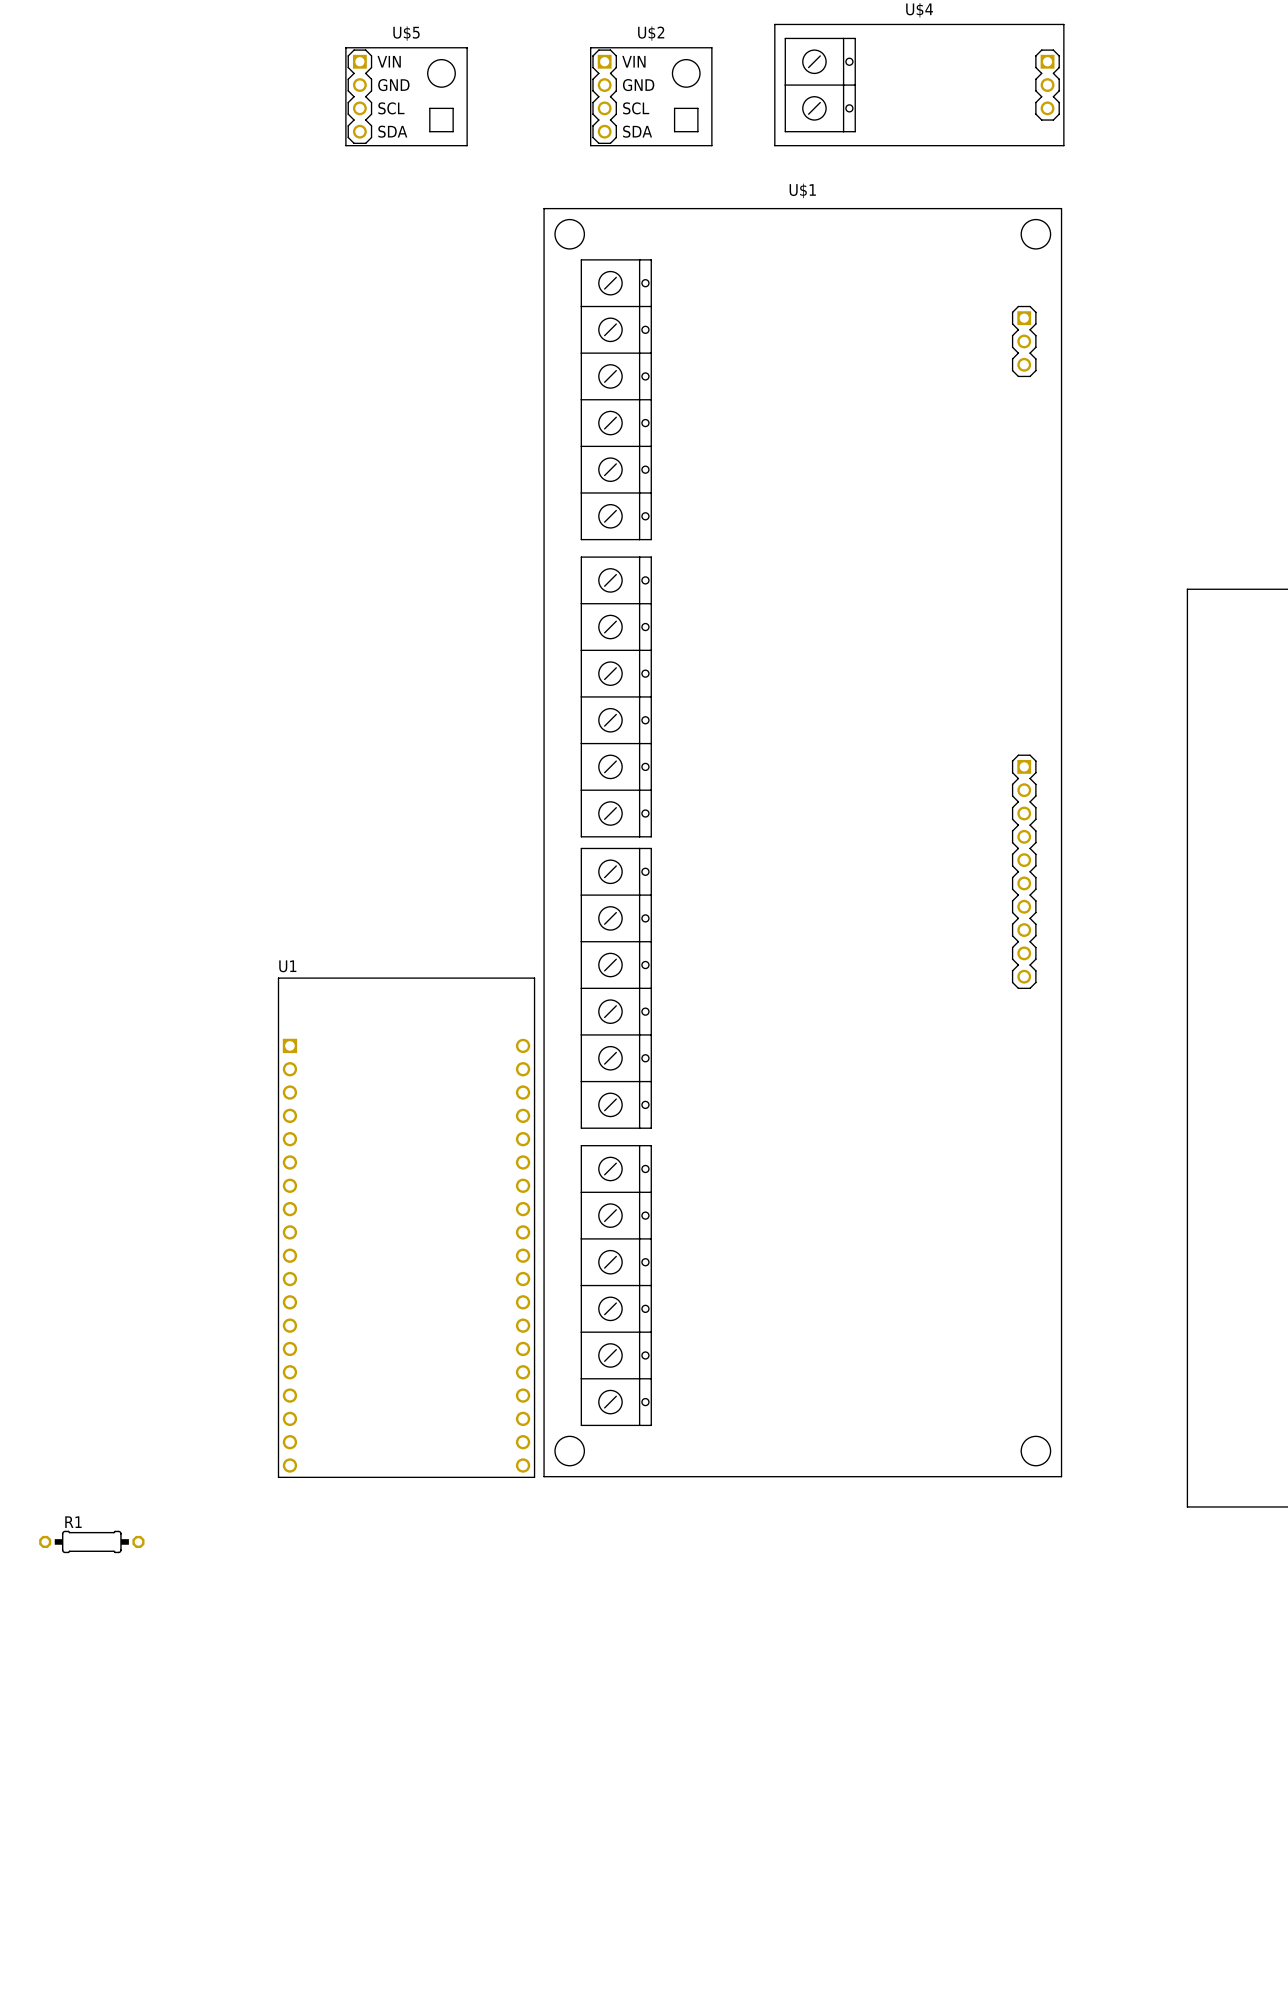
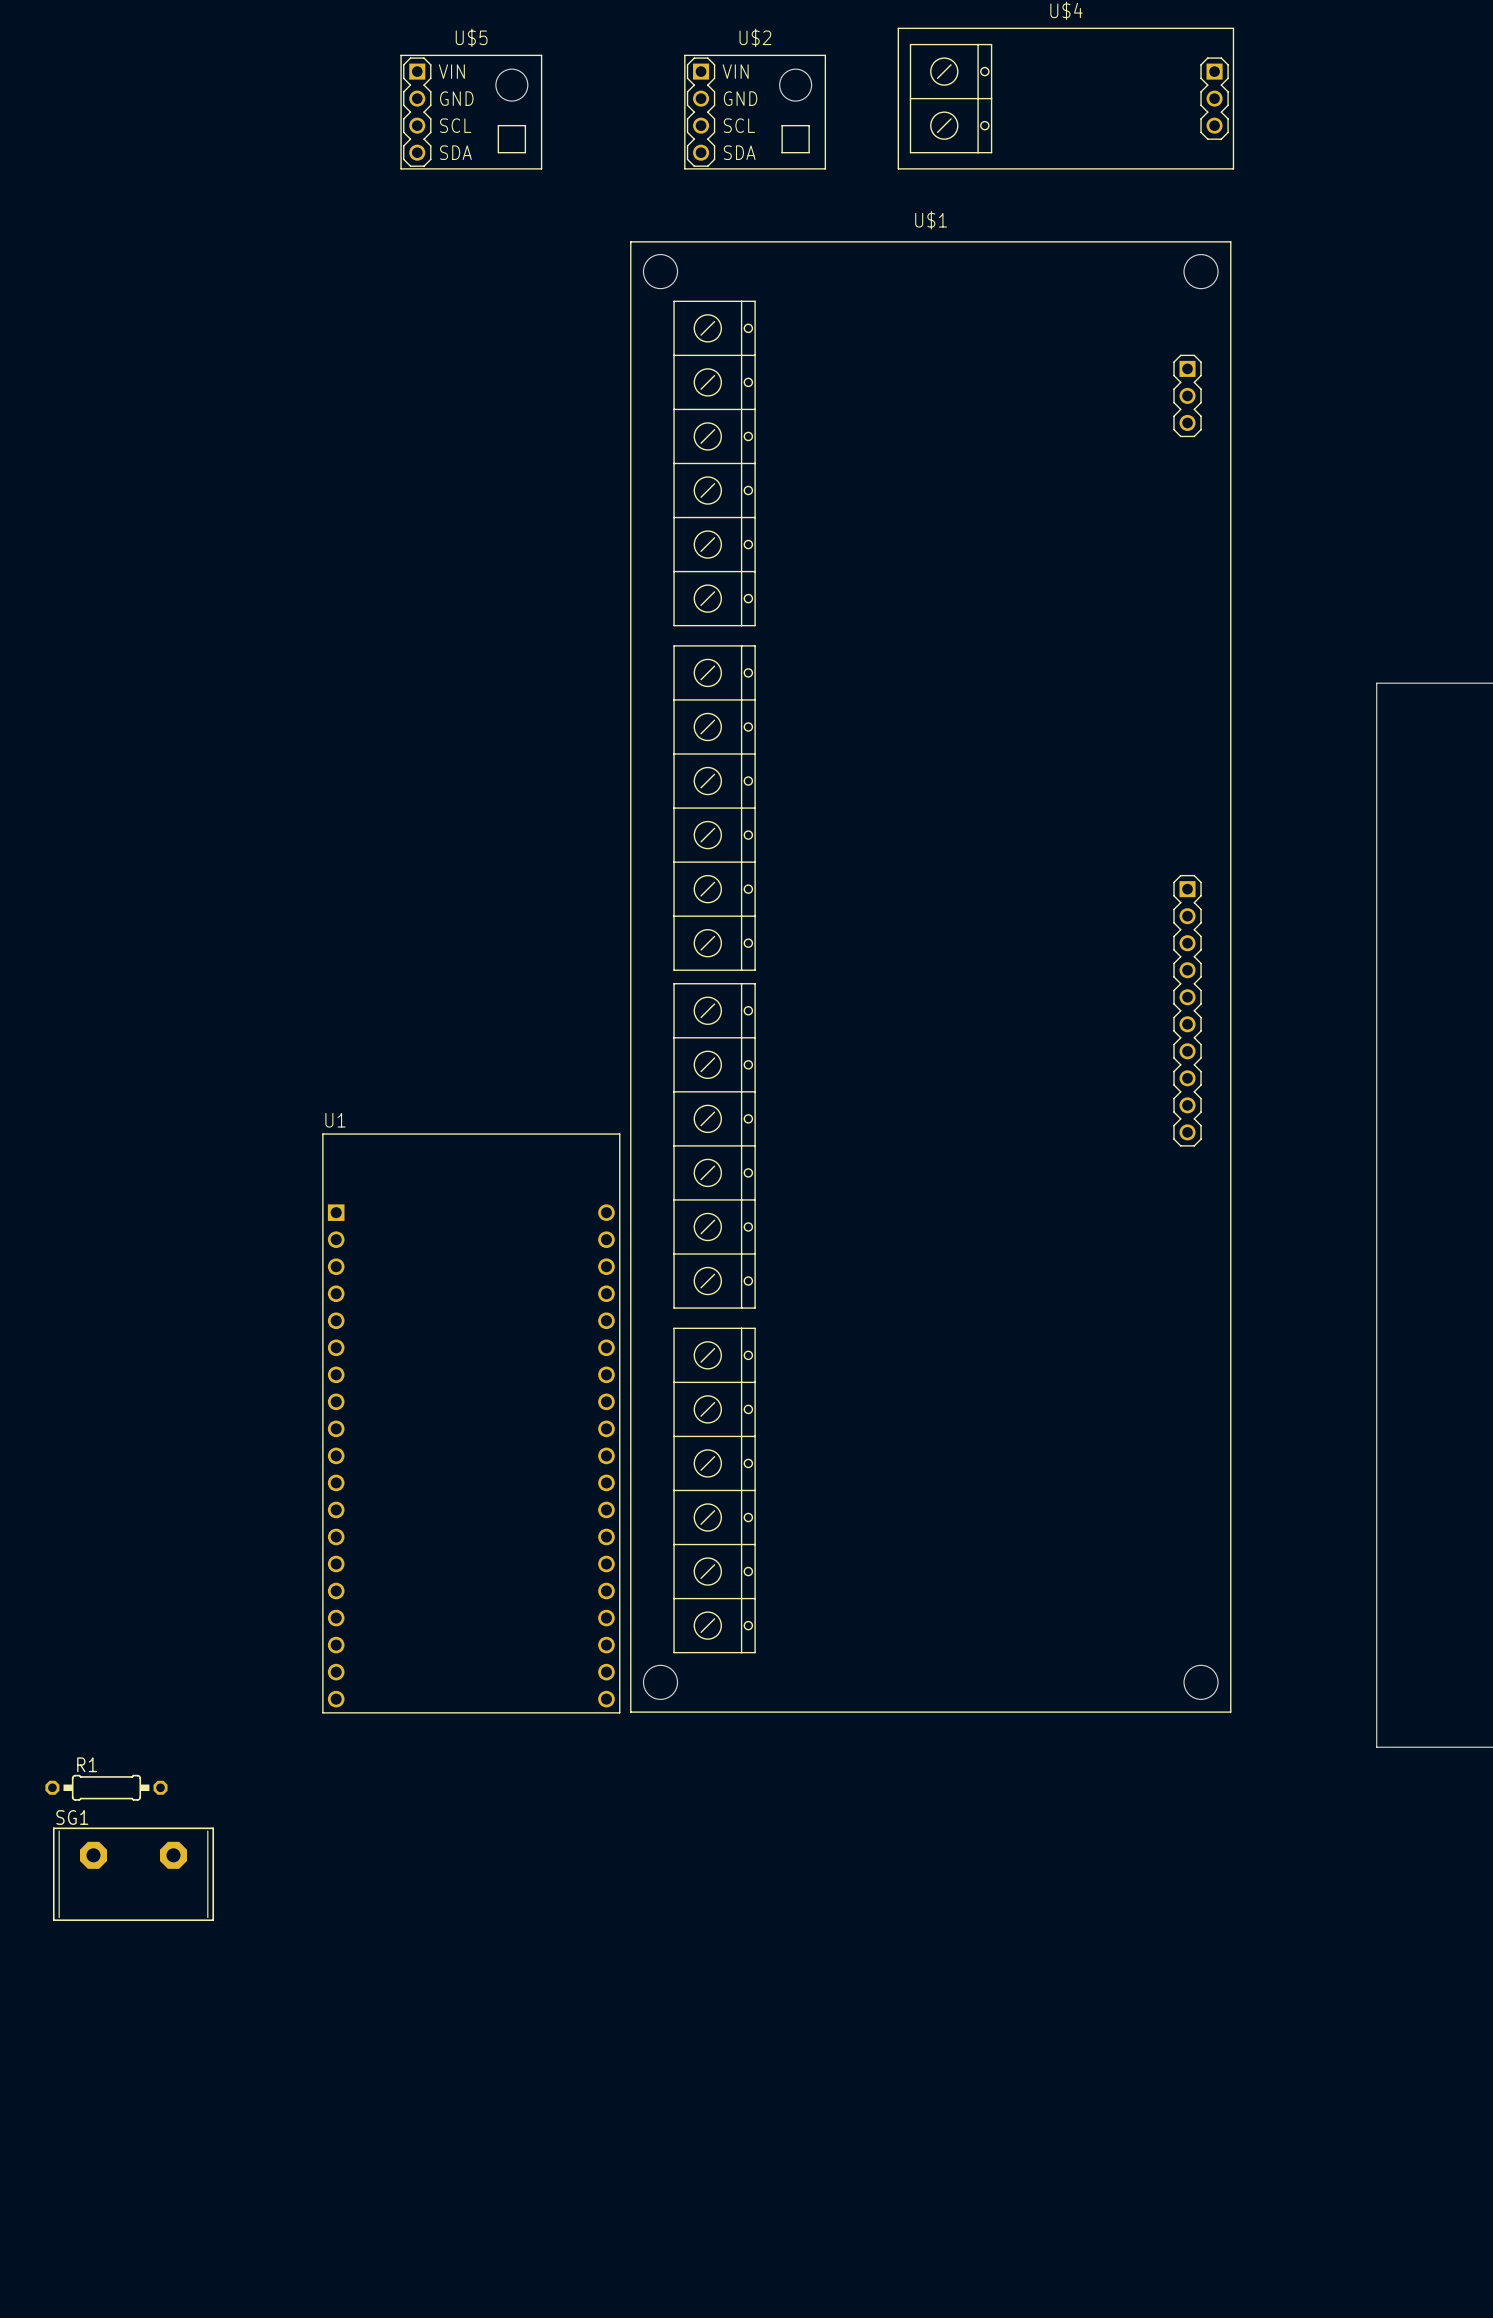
SG1: none -> (133, 1874)

